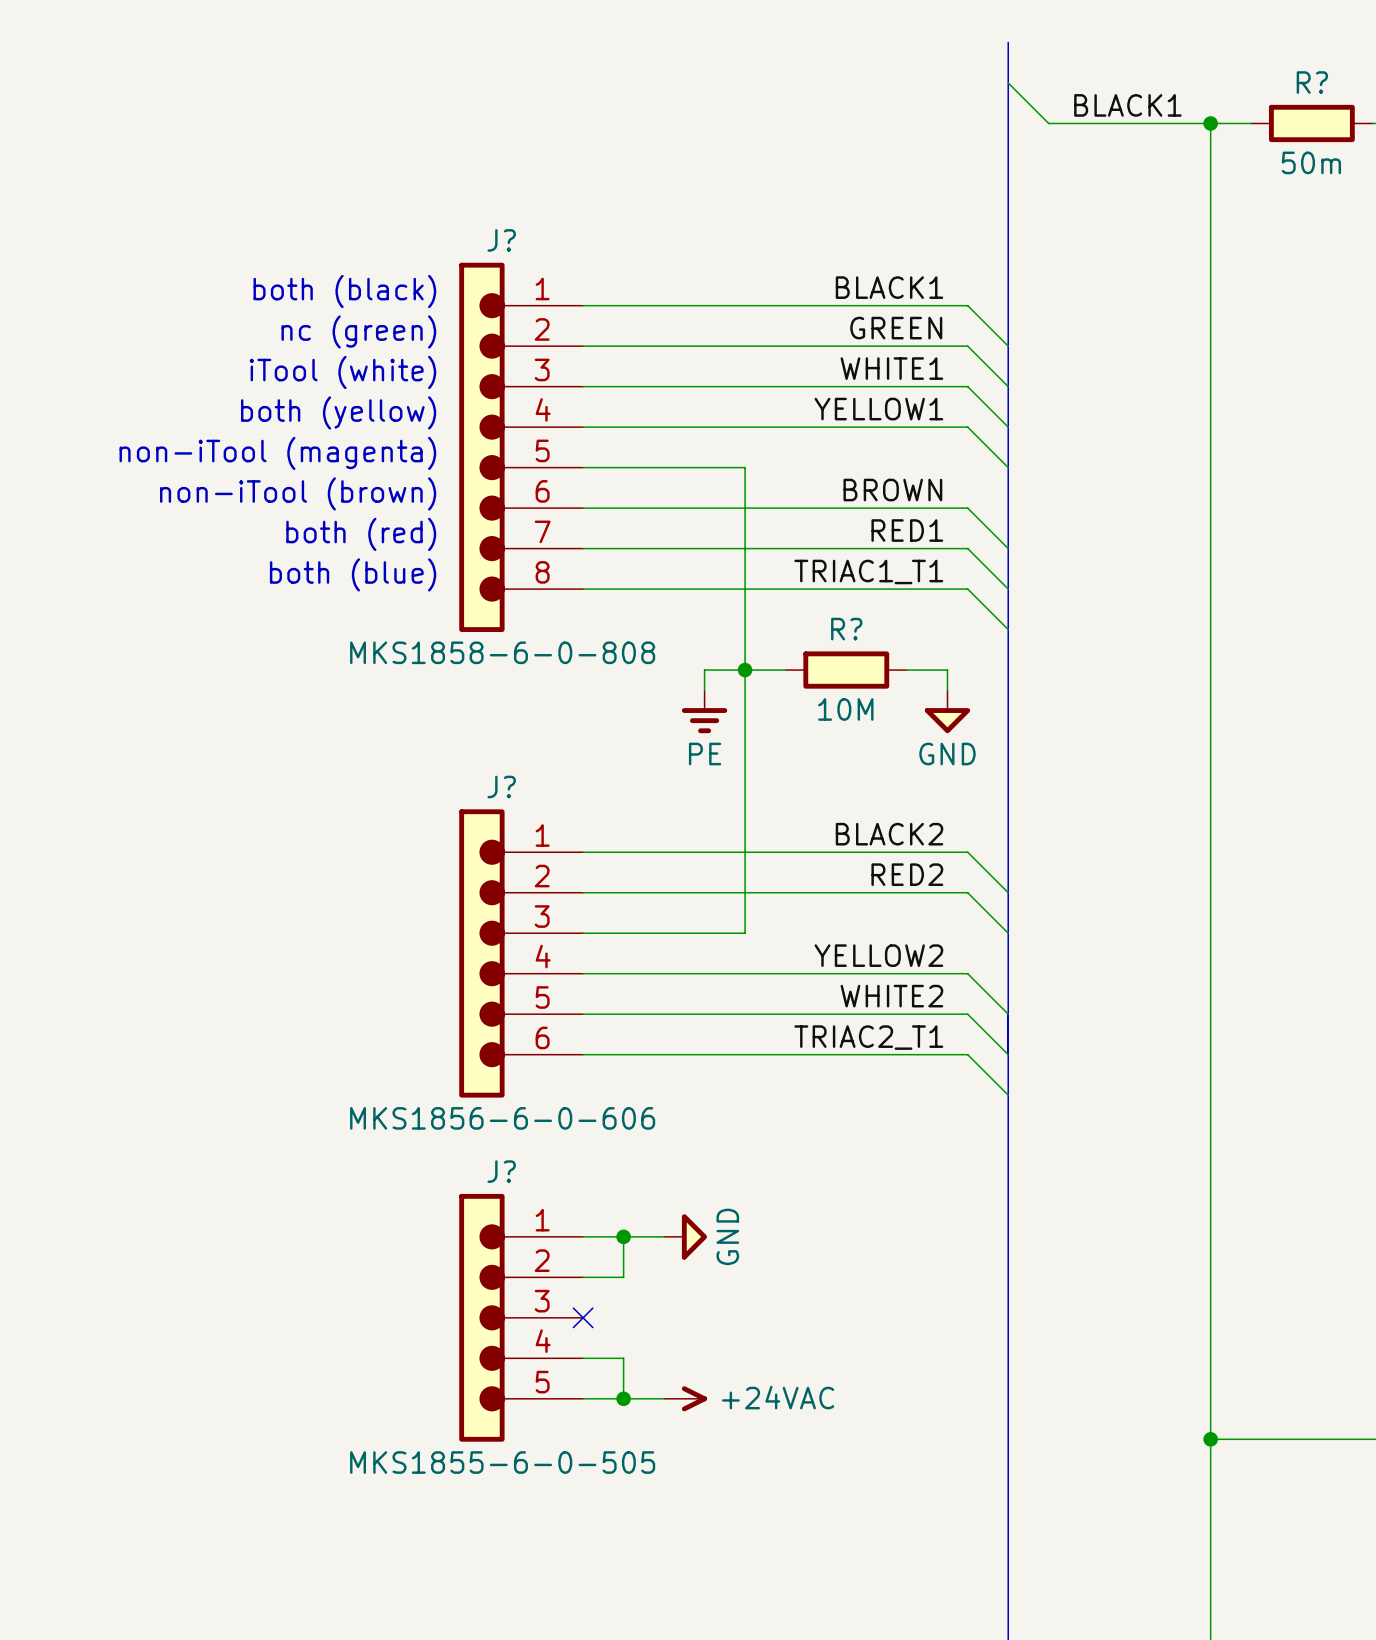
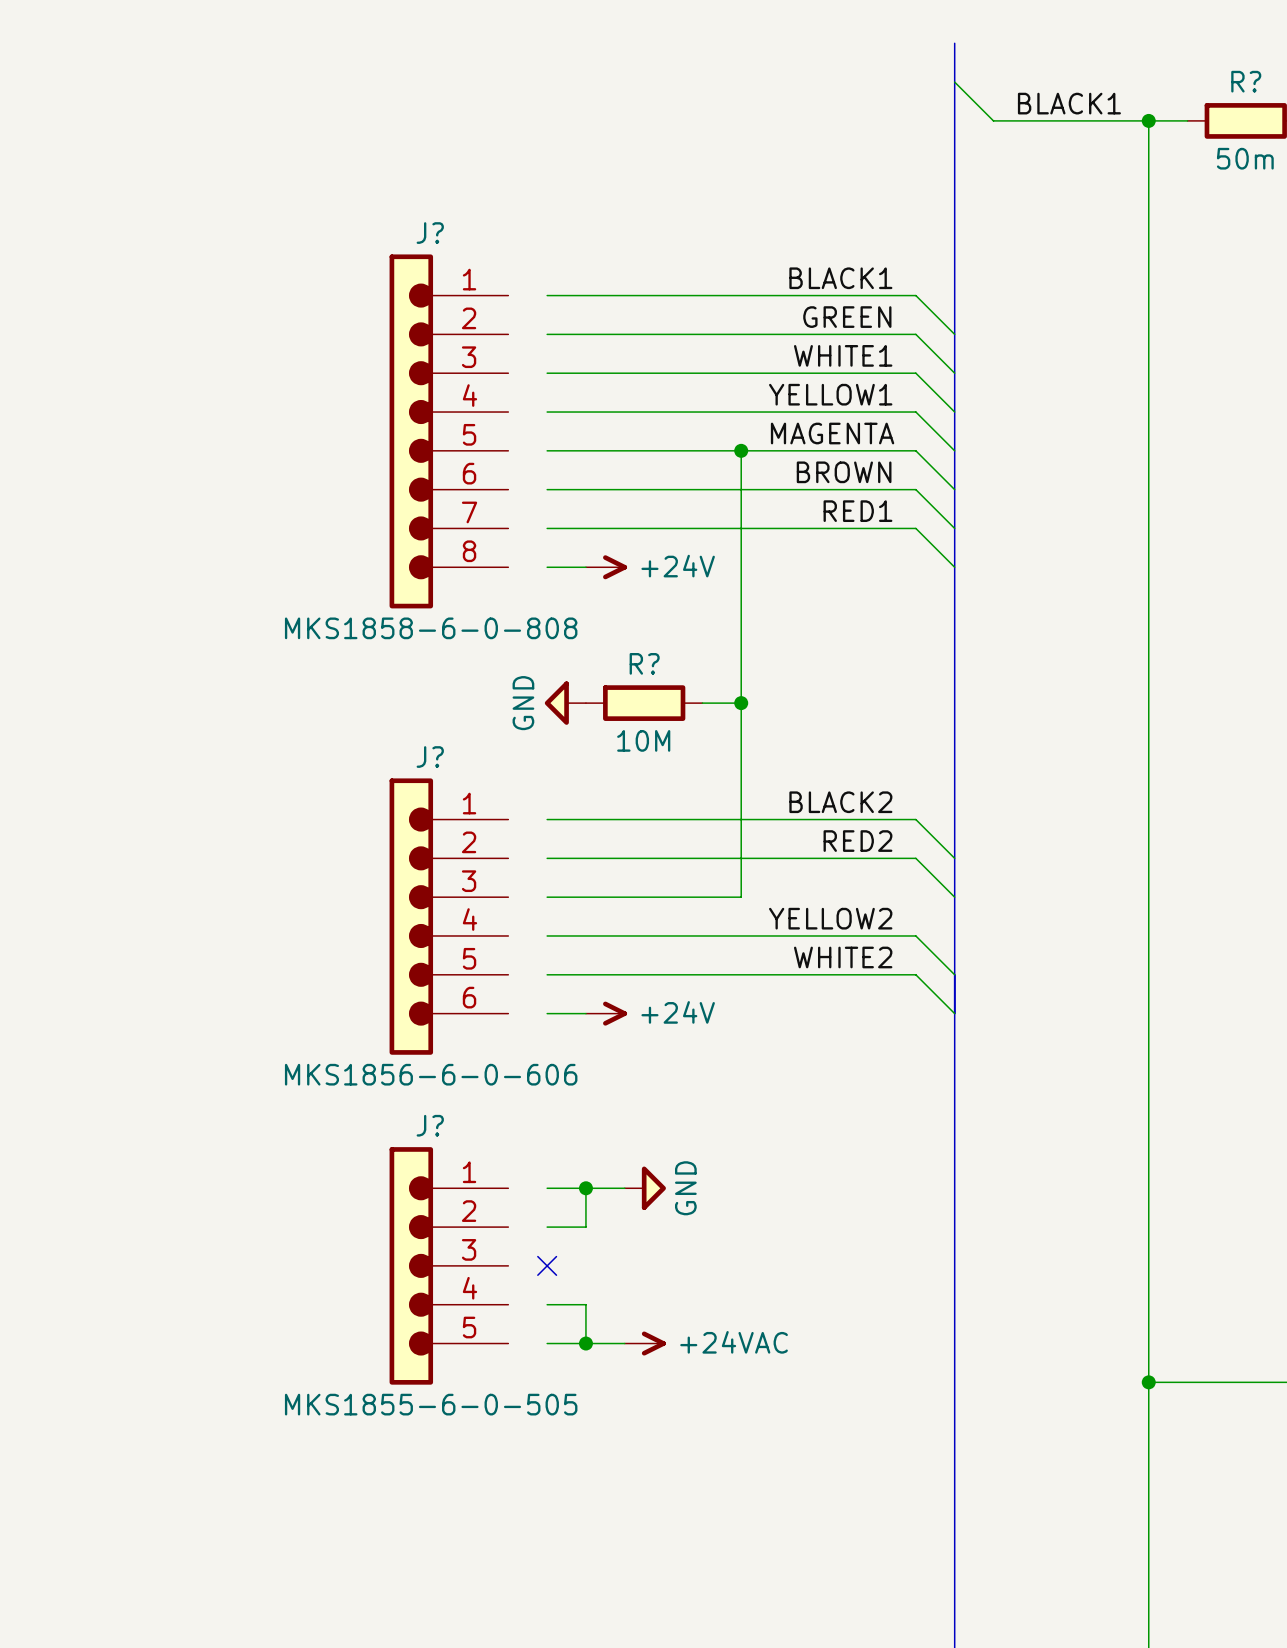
text: both (black) (344, 291) -> none
text: nc (green) (358, 331) -> none
text: iTool (white) (342, 372) -> none
text: both (yellow) (338, 412) -> none
J? position: (521, 447) -> (448, 431)
label: none -> MAGENTA (832, 433)
text: non-iTool (magenta) (277, 453) -> none
wire: (745, 467) (745, 933) -> (741, 450) (741, 897) (702, 897)
wire: none -> (702, 450) (915, 450) (954, 489)
junction: none -> (741, 450)
text: non-iTool (brown) (298, 493) -> none
text: both (red) (361, 534) -> none
label: TRIAC1_T1 (868, 571) -> none
text: both (blue) (353, 574) -> none
wire: (623, 589) (967, 589) (1008, 629) -> none
power symbol: none -> +24V (606, 567)
junction position: (745, 670) -> (741, 703)
wire: (785, 670) (704, 670) (704, 690) -> none
R? position: (846, 670) -> (644, 703)
wire: (907, 670) (947, 670) (947, 690) -> none
power symbol: PE (704, 711) -> none
power symbol rotation: 0° (947, 711) -> 90° clockwise (565, 703)
power symbol position: GND (947, 711) -> GND (565, 703)
wire: none -> (702, 703) (741, 703)
J? position: (521, 953) -> (448, 916)
label: TRIAC2_T1 (868, 1037) -> none
wire: (623, 1054) (967, 1054) (1008, 1095) -> none
power symbol: none -> +24V (606, 1013)
J? position: (521, 1317) -> (448, 1265)

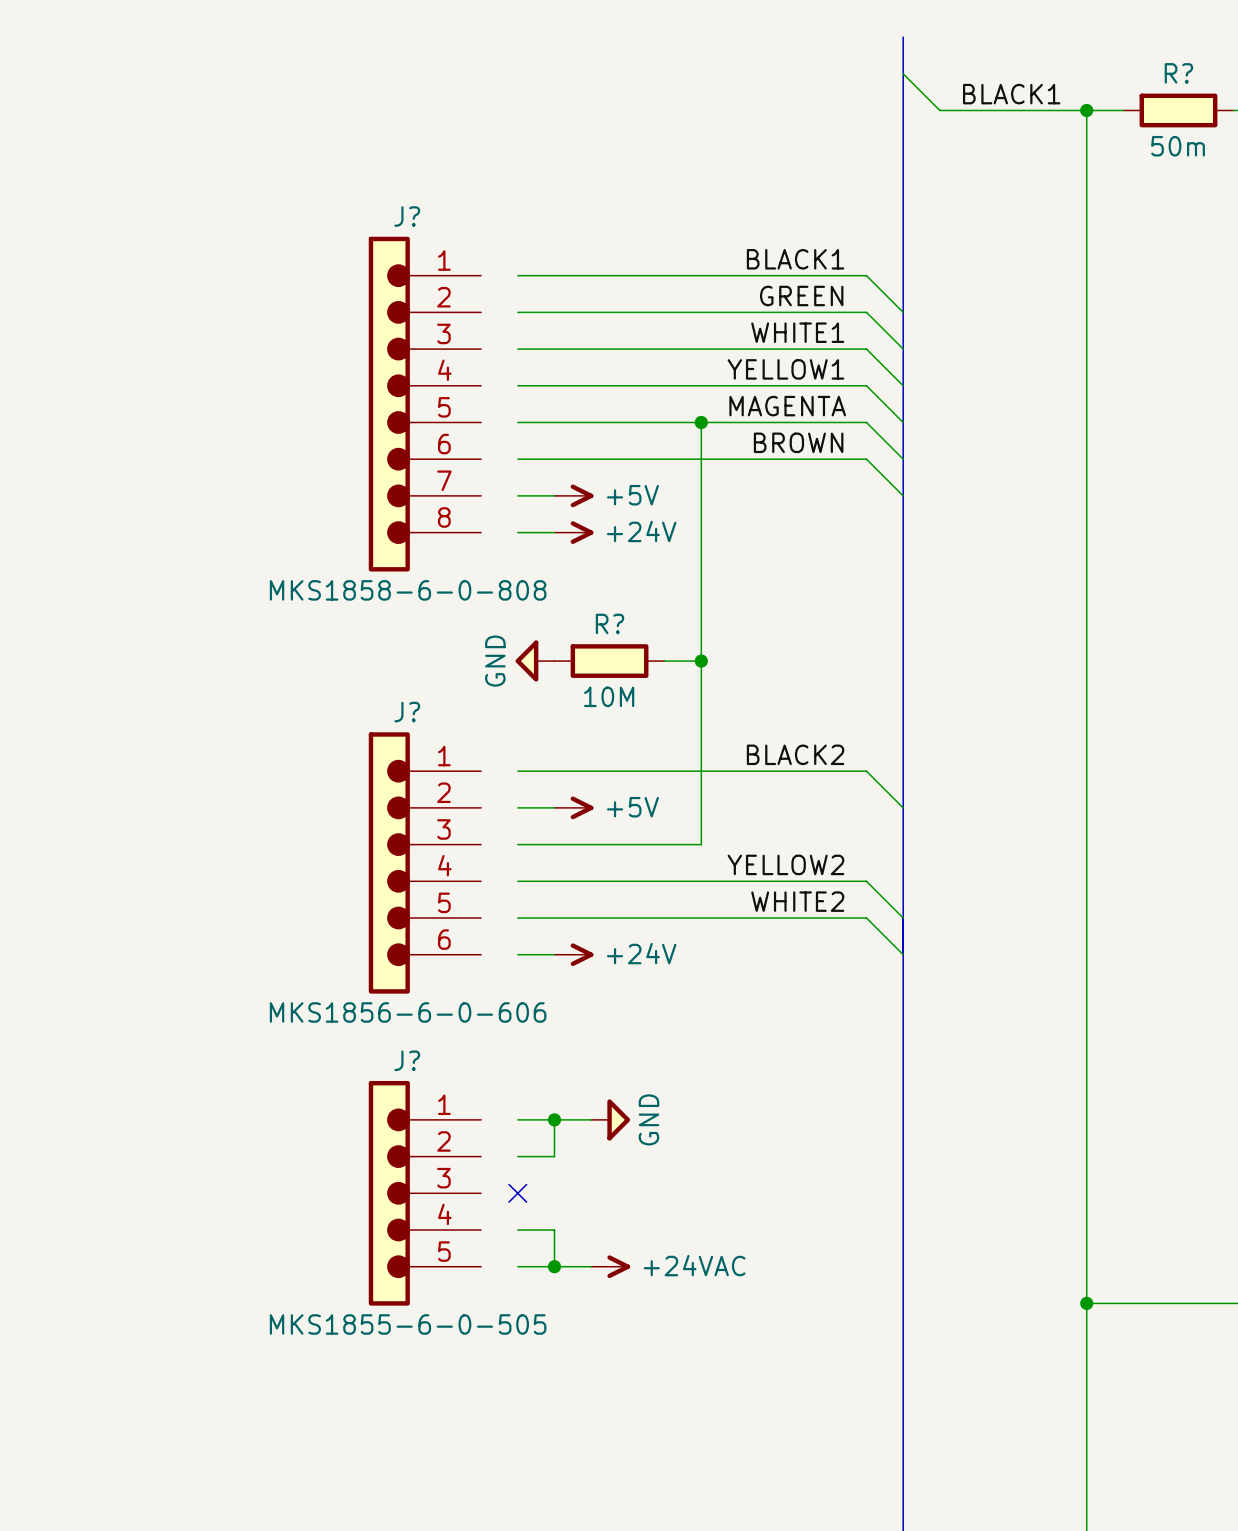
label: RED1 (857, 511) -> none
wire: (585, 528) (915, 528) (954, 567) -> none
power symbol: none -> +5V (573, 495)
label: RED2 (857, 841) -> none
wire: (585, 858) (915, 858) (954, 897) -> none
power symbol: none -> +5V (573, 807)

